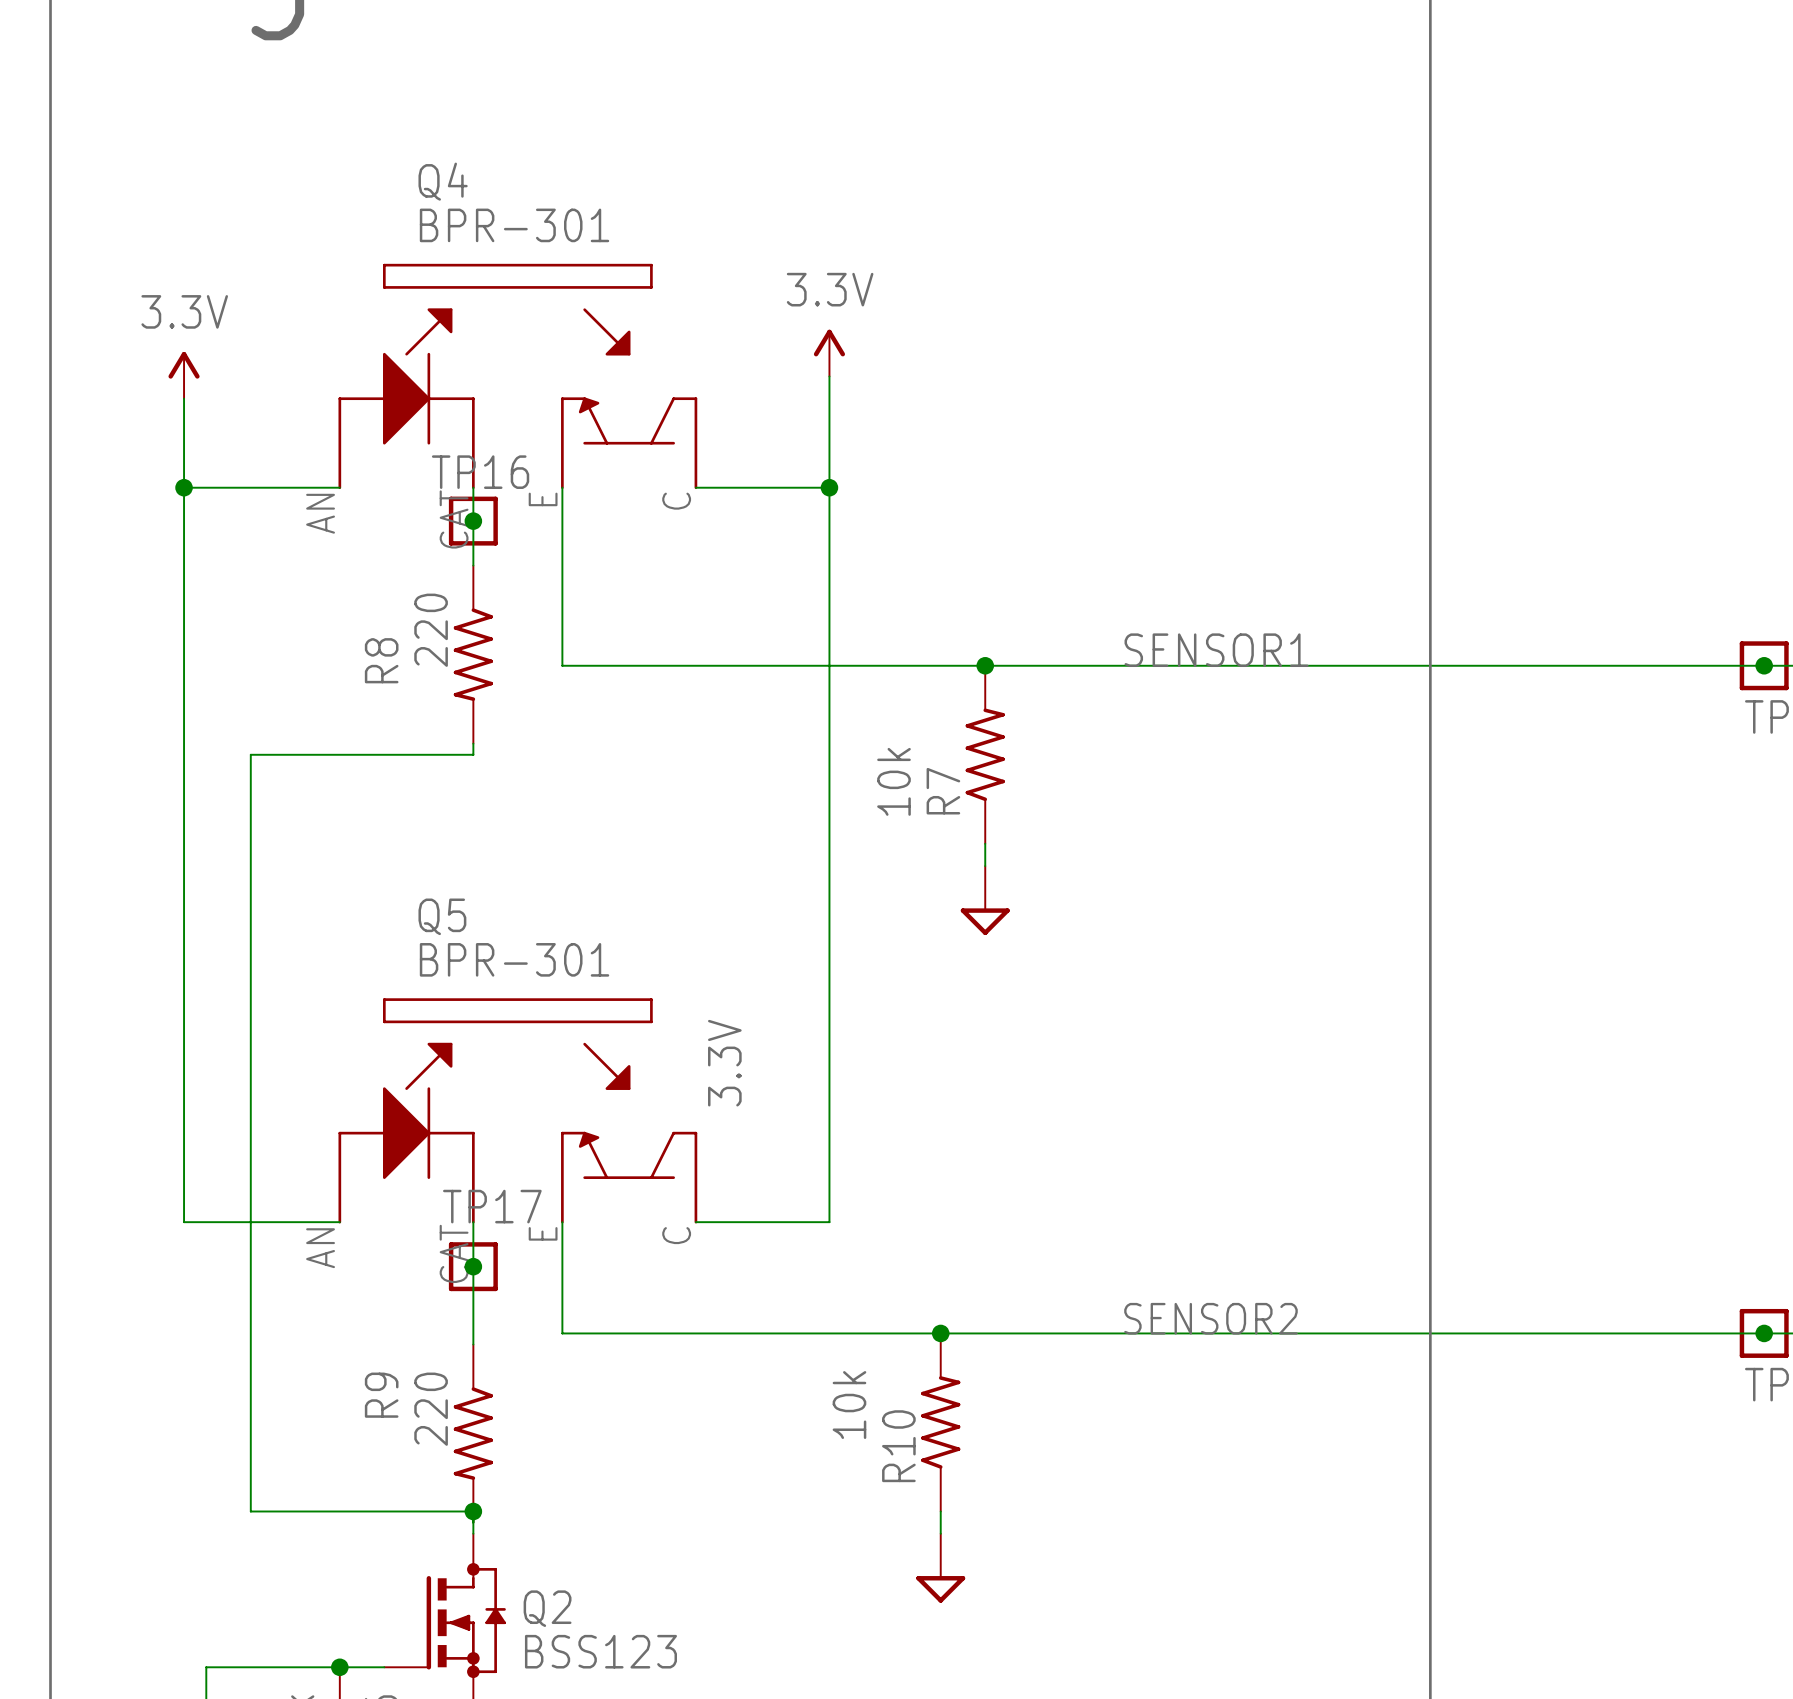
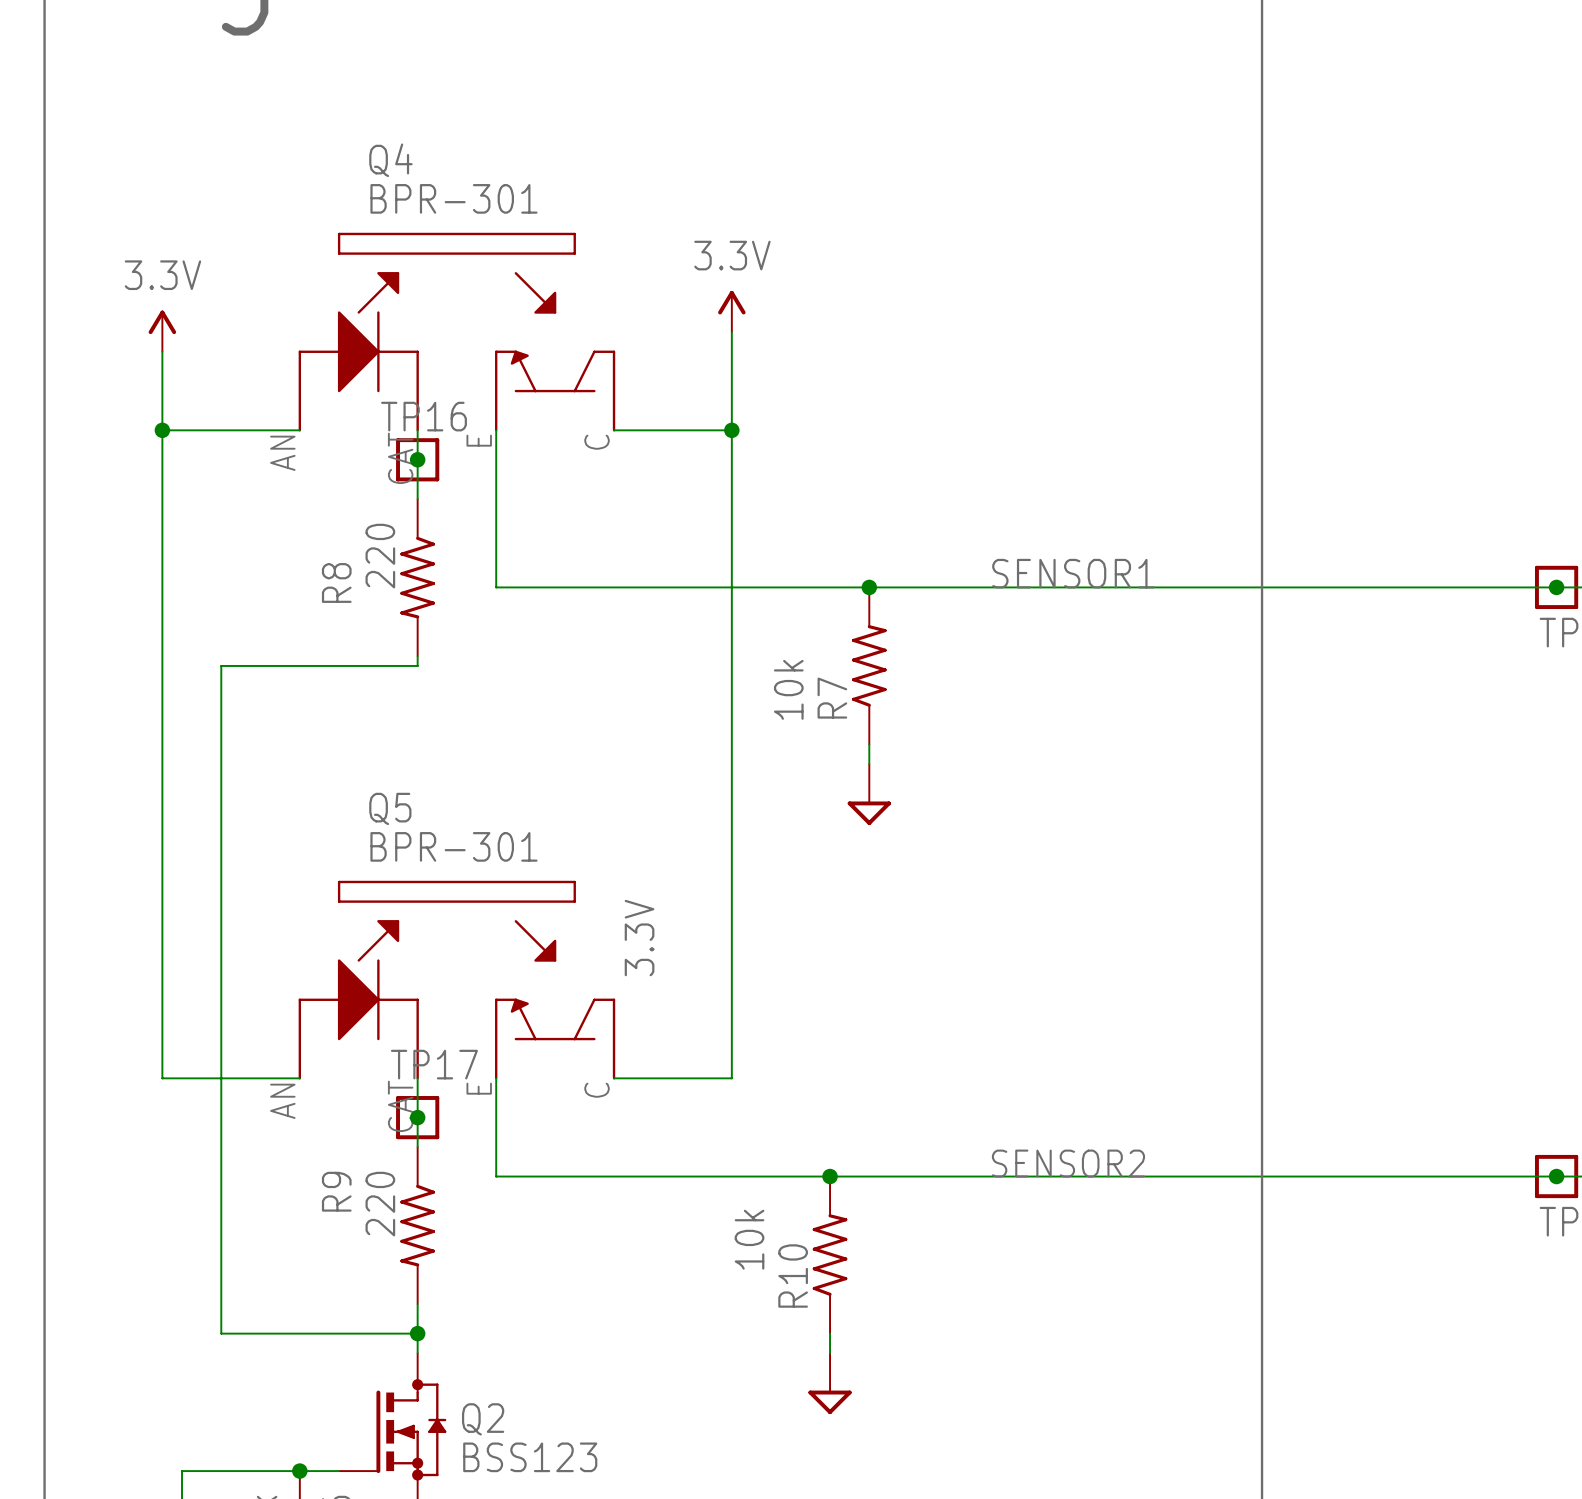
R9 position: (473, 1433) -> (417, 1225)

